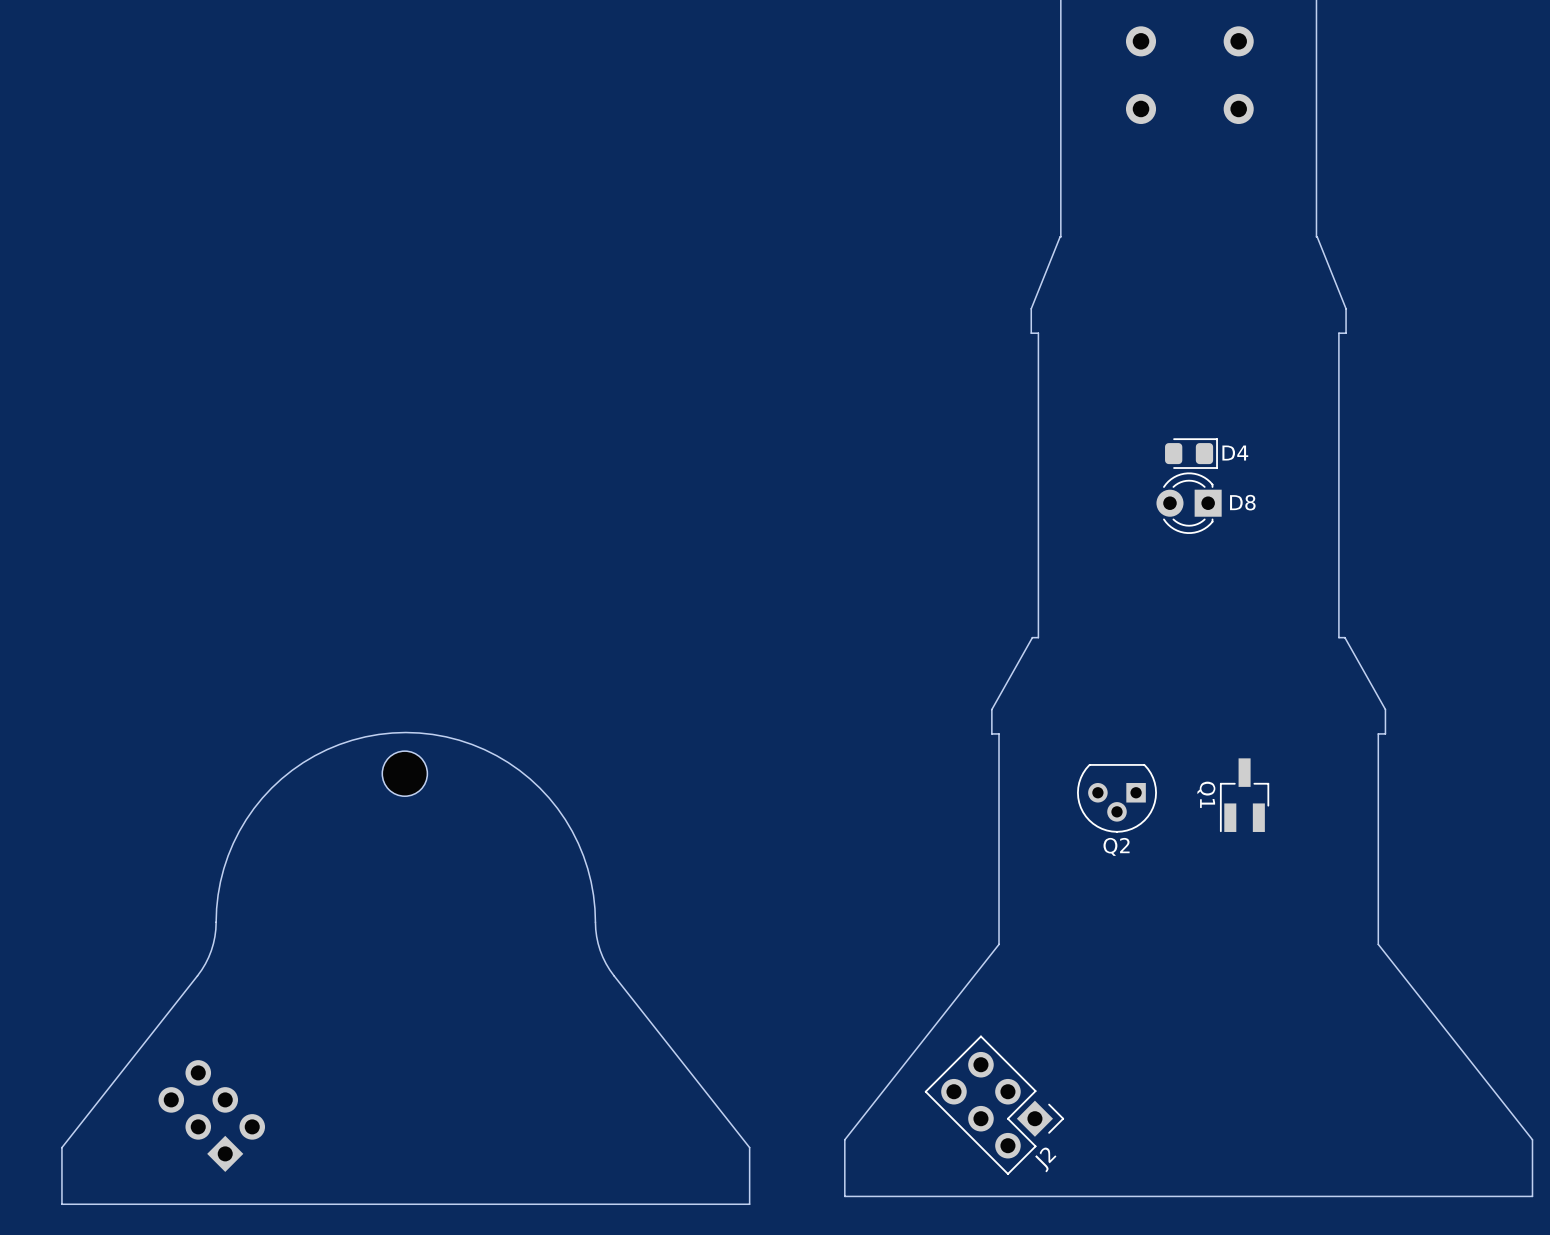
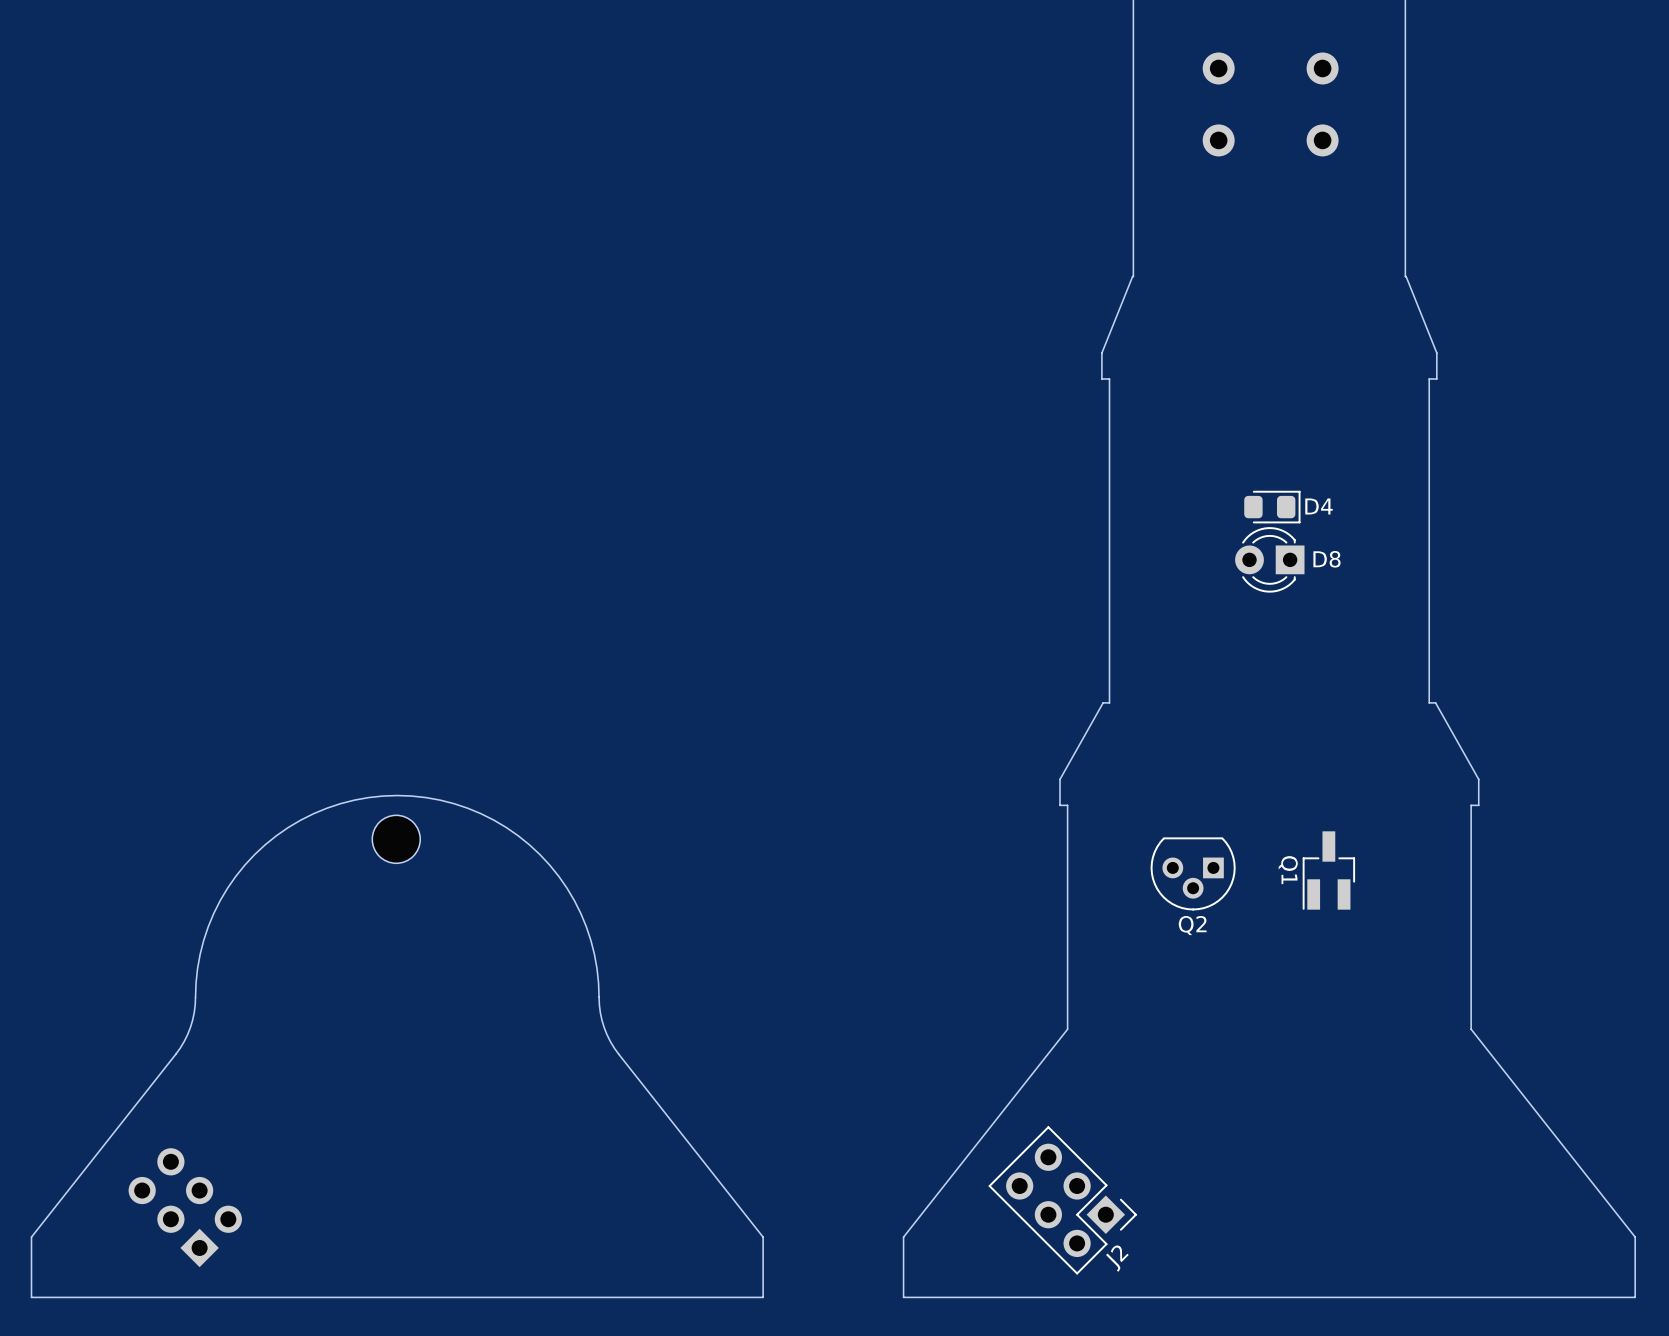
part position: (404, 773) -> (396, 839)
board edge: (595, 922) (600, 950) (609, 969) (749, 1147) (749, 1204) (61, 1204) (61, 1147) (197, 975) (208, 957) (214, 936) (220, 881) (228, 855) (239, 831) (253, 808) (271, 788) (292, 770) (314, 755) (339, 744) (365, 736) (405, 732) (432, 734) (459, 740) (484, 749) (508, 762) (529, 778) (549, 797) (572, 831) (583, 855) (591, 881) (595, 922) -> (599, 997) (601, 1020) (614, 1048) (763, 1237) (763, 1297) (31, 1297) (31, 1237) (175, 1054) (187, 1034) (194, 1012) (200, 954) (208, 926) (220, 900) (235, 876) (254, 854) (276, 835) (300, 820) (326, 808) (354, 800) (397, 795) (440, 800) (467, 808) (494, 820) (518, 835) (539, 854) (558, 876) (574, 900) (586, 926) (594, 954) (599, 997)
part position: (211, 1116) -> (185, 1207)

